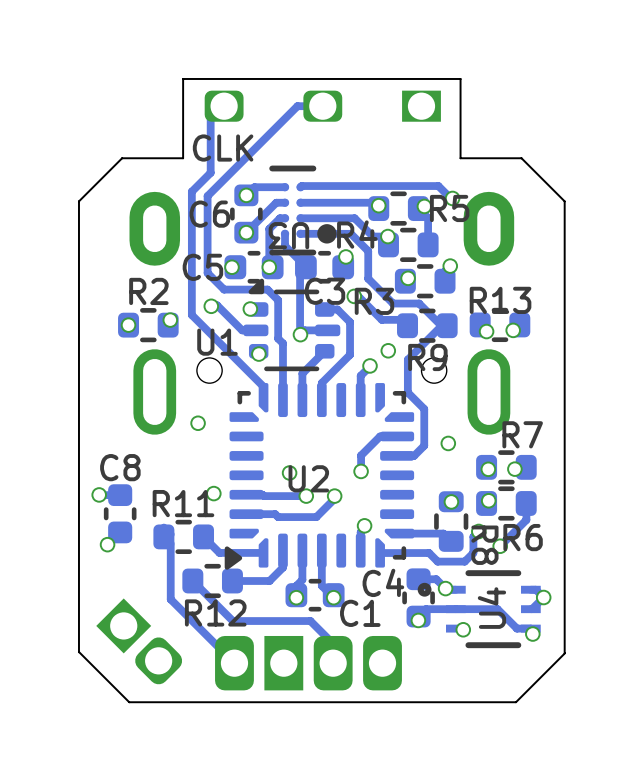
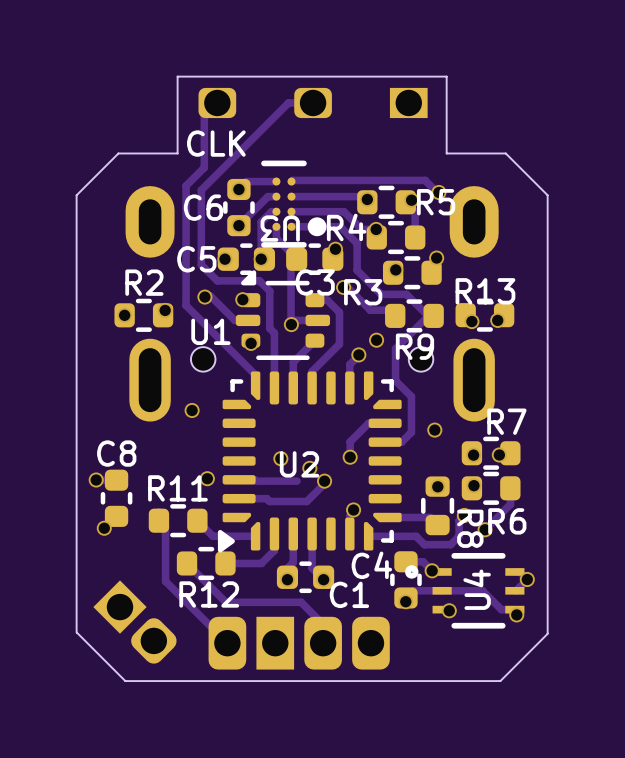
via position: (306, 496) -> (309, 468)

